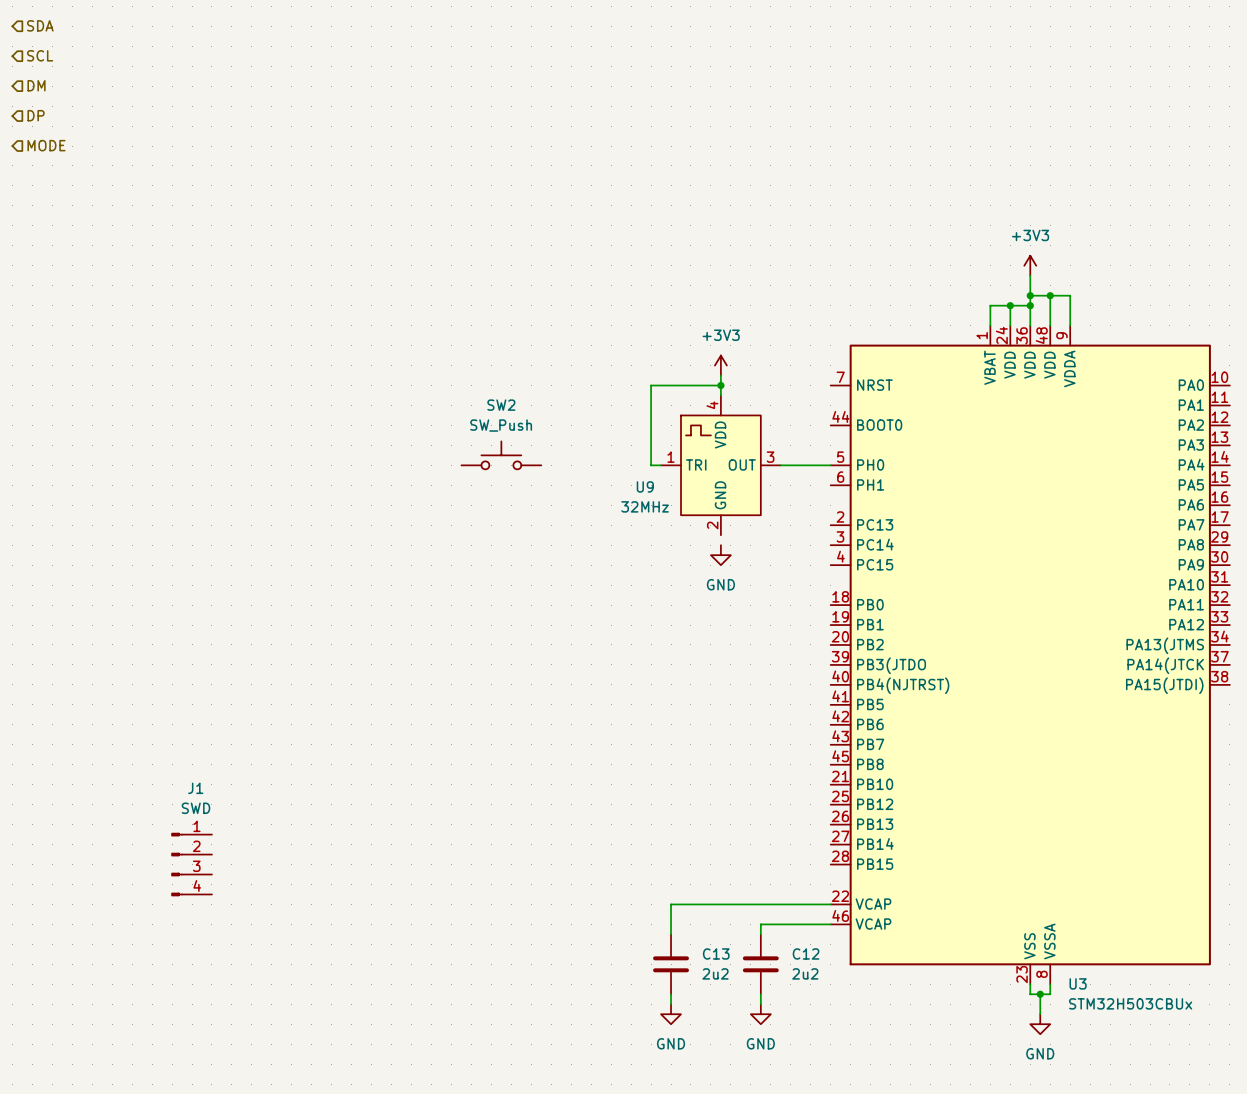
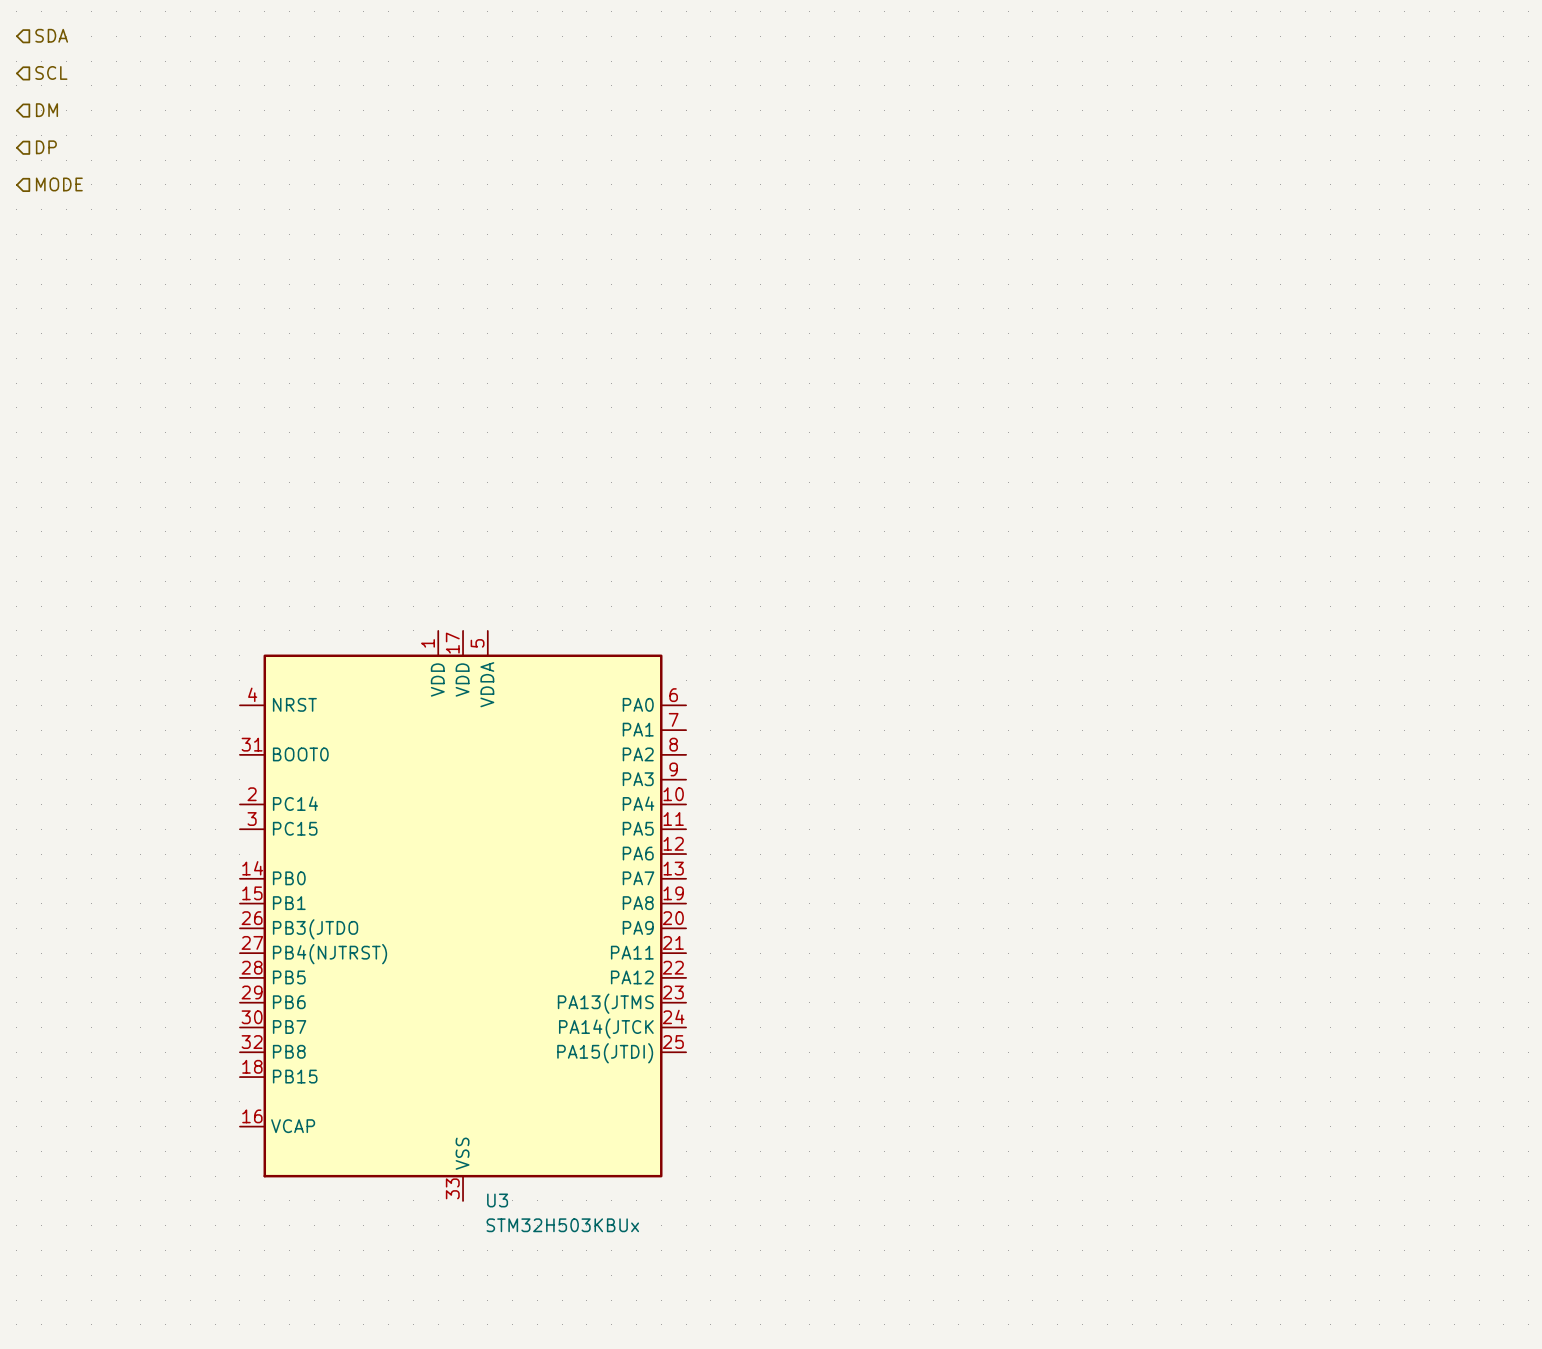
power symbol: +3V3 (1030, 265) -> none
wire: (1030, 275) (1030, 325) -> none
wire: (1030, 295) (1070, 295) (1070, 325) -> none
junction: (1030, 295) -> none
wire: (1050, 295) (1050, 325) -> none
junction: (1050, 295) -> none
wire: (1010, 305) (1010, 325) -> none
junction: (1010, 305) -> none
wire: (1030, 305) (990, 305) (990, 325) -> none
junction: (1030, 305) -> none
U3 symbol: [830, 325, 1230, 985] -> [239, 630, 687, 1201]
power symbol: +3V3 (720, 365) -> none
wire: (720, 375) (720, 395) -> none
wire: (720, 385) (651, 385) (651, 465) (661, 465) -> none
junction: (720, 385) -> none
SW2: SW_Push (501, 455) -> none
U9: 32MHz (720, 465) -> none
wire: (780, 465) (830, 465) -> none
power symbol: GND (720, 555) -> none
J1: SWD (191, 864) -> none
wire: (830, 904) (671, 904) (671, 934) -> none
wire: (830, 924) (760, 924) (760, 934) -> none
C13: 2u2 (671, 964) -> none
C12: 2u2 (760, 964) -> none
U3 name position: U3 (1078, 983) -> U3 (497, 1200)
wire: (1030, 984) (1030, 994) (1050, 994) (1050, 984) -> none
wire: (671, 994) (671, 1004) -> none
wire: (760, 994) (760, 1004) -> none
wire: (1040, 994) (1040, 1014) -> none
junction: (1040, 994) -> none
U3 value: STM32H503CBUx (1130, 1003) -> STM32H503KBUx (562, 1225)
power symbol: GND (671, 1014) -> none
power symbol: GND (760, 1014) -> none
power symbol: GND (1040, 1024) -> none

